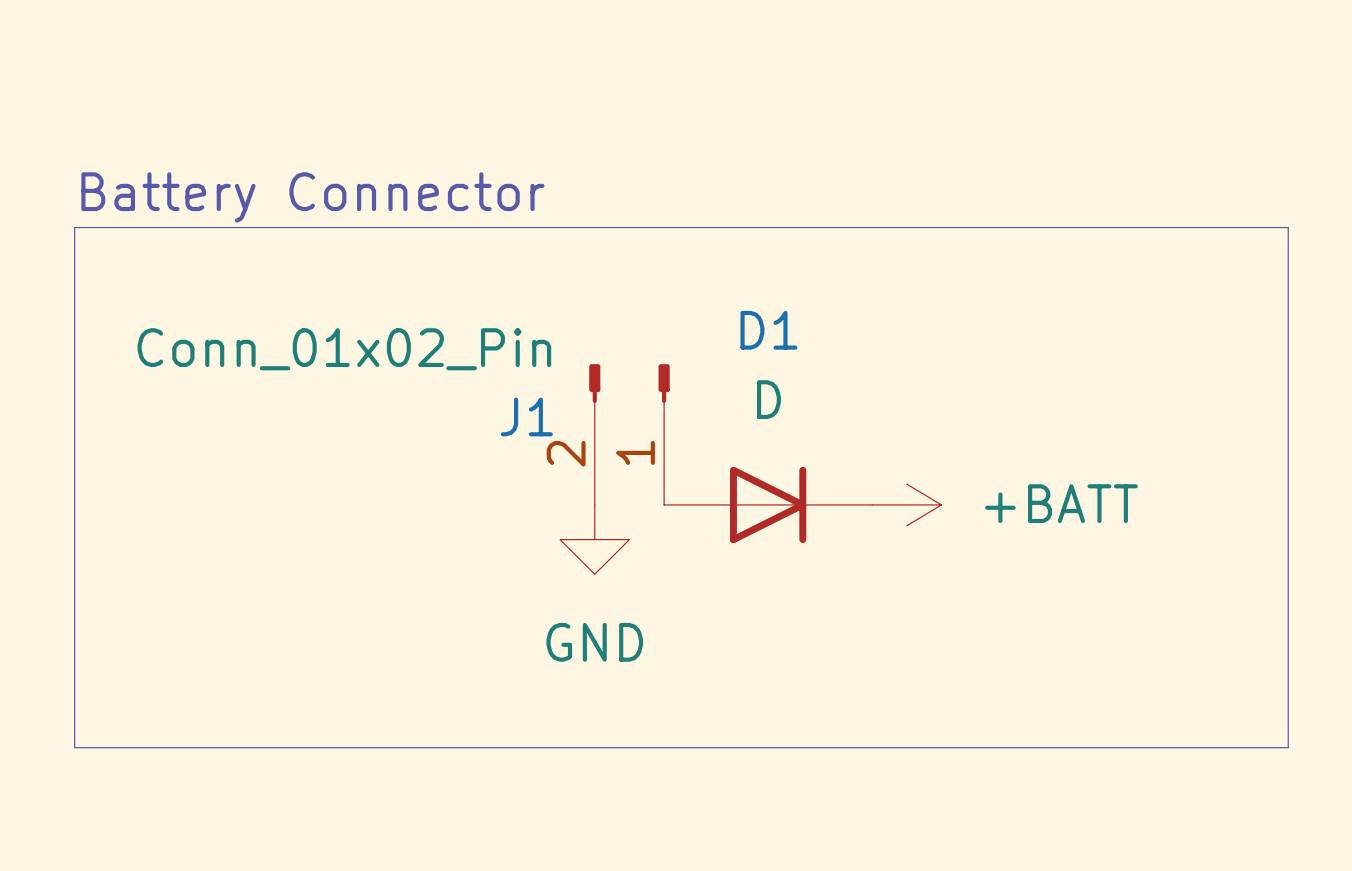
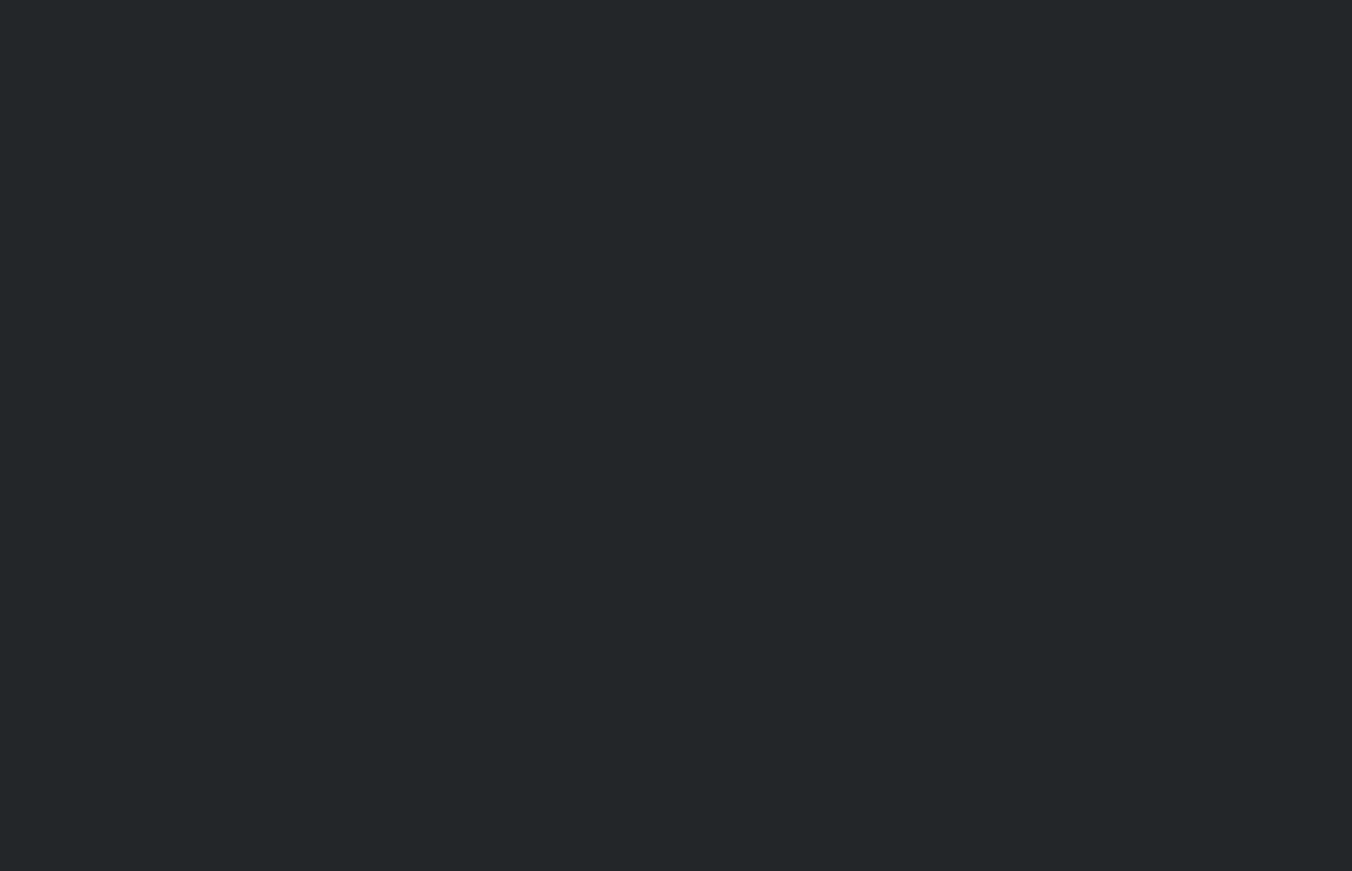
text: Battery Connector (312, 197) -> none
line: (74, 227) (1288, 227) (1288, 747) (74, 747) (74, 227) -> none
J1: Conn_01x02_Pin (629, 434) -> none
D1: D (768, 504) -> none
power symbol: +BATT (906, 504) -> none
power symbol: GND (594, 539) -> none

